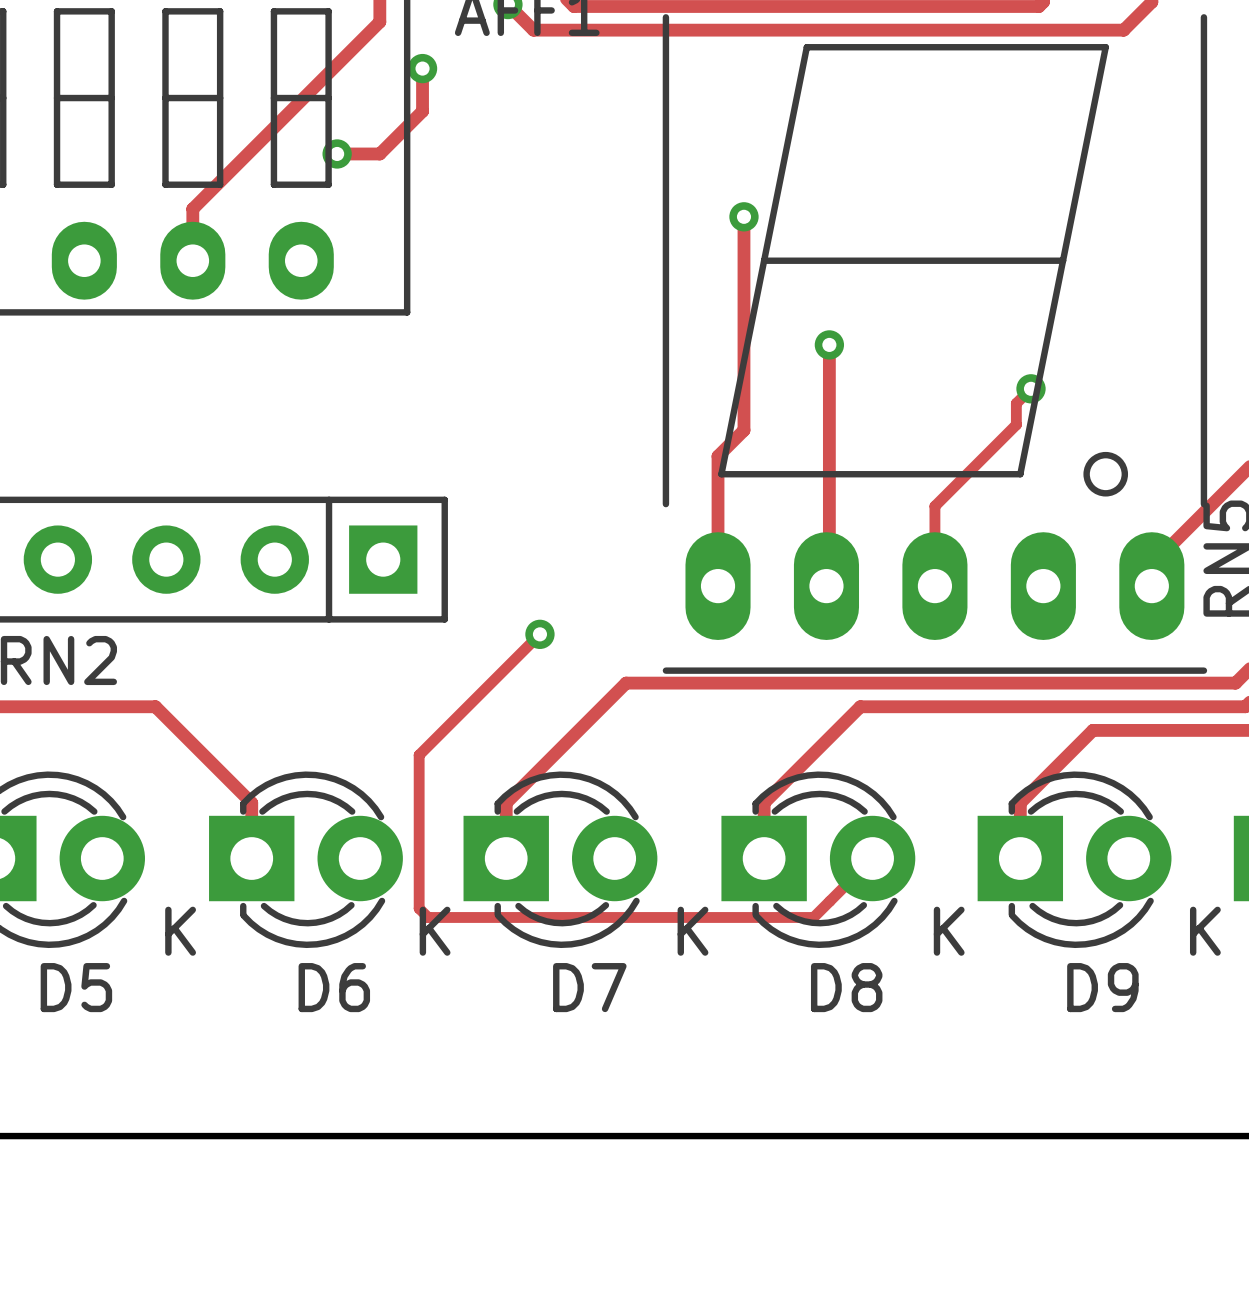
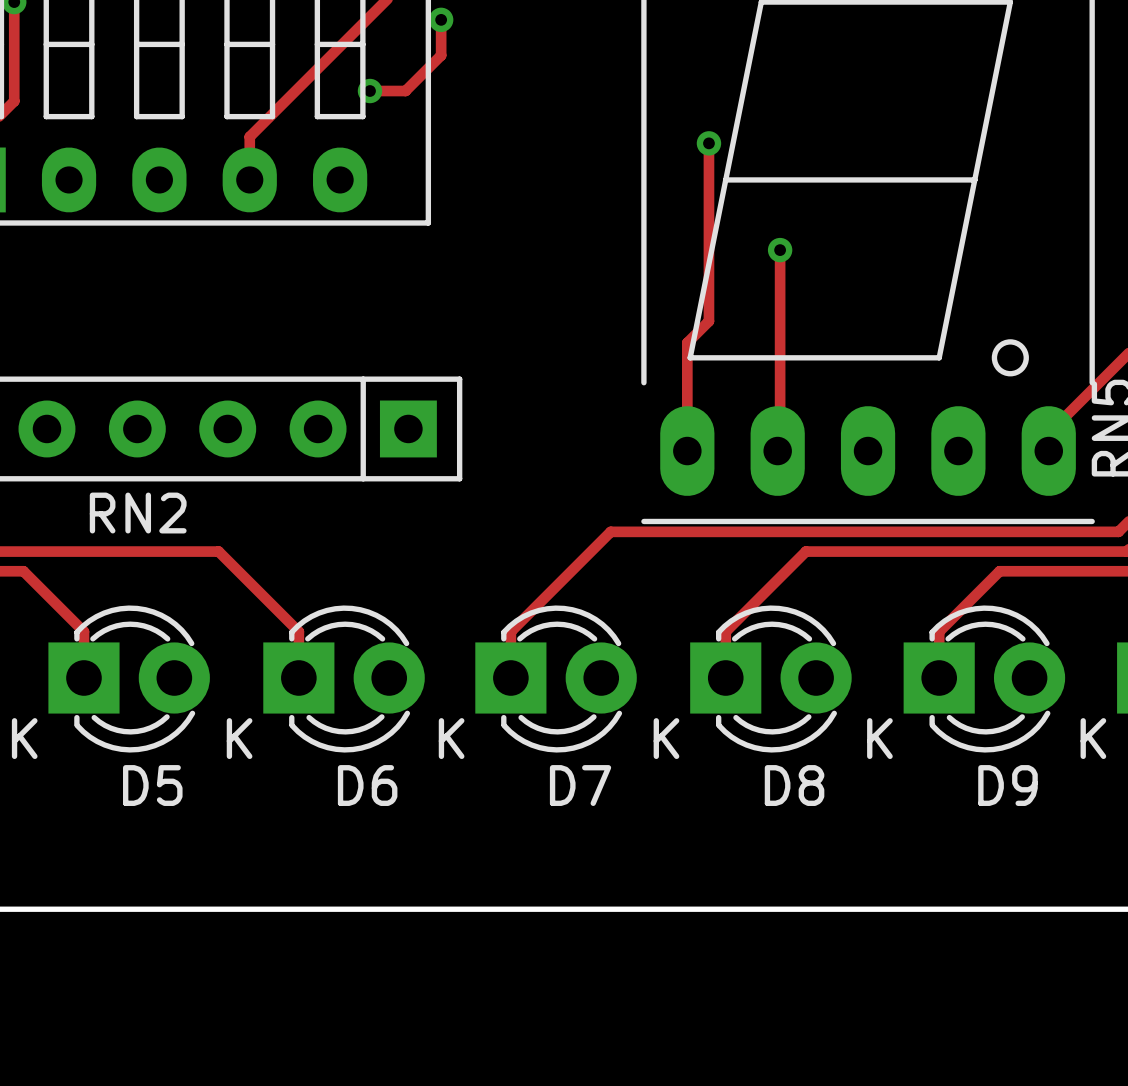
track: (1031, 388) (1016, 403) (1016, 424) (934, 506) (934, 586) -> none
via: (1031, 388) -> none
track: (539, 634) (419, 755) (419, 908) (428, 917) (813, 917) (872, 858) -> none
via: (539, 634) -> none

